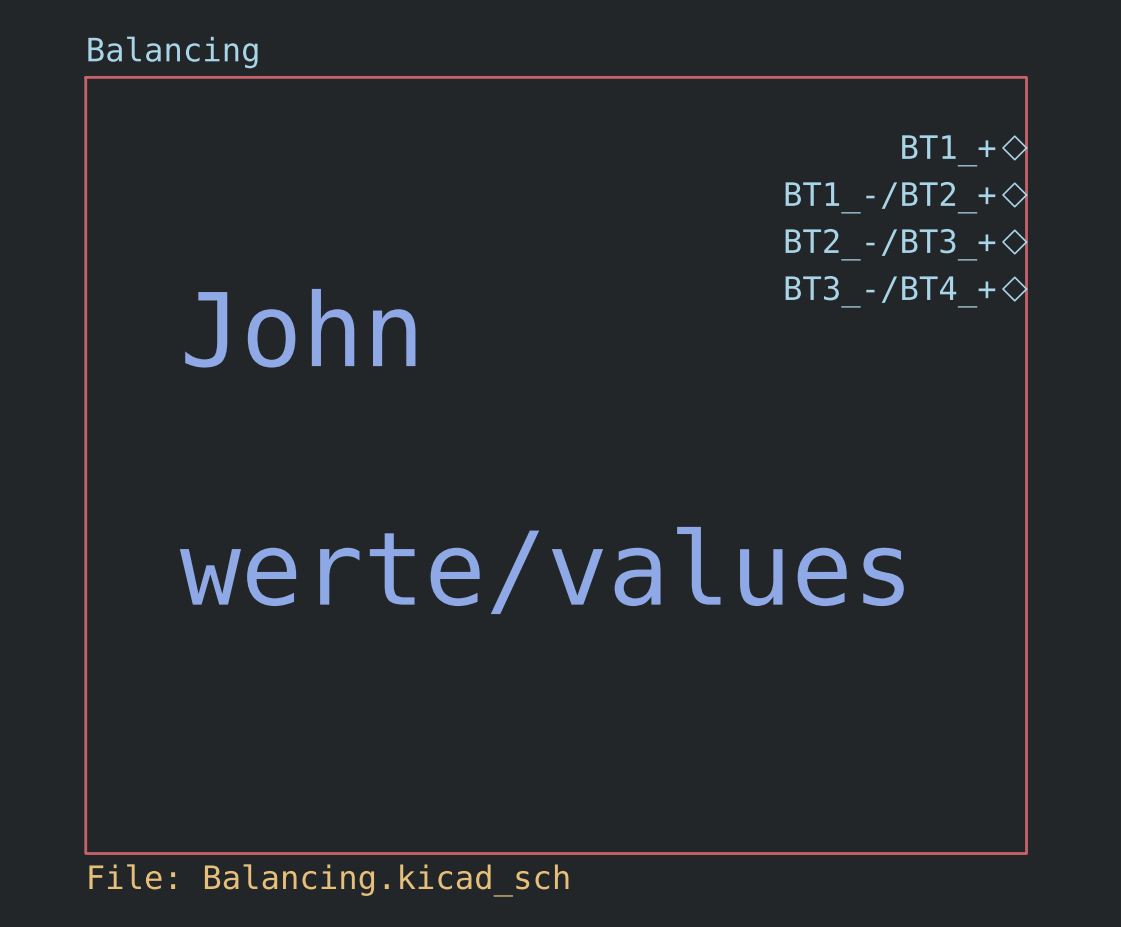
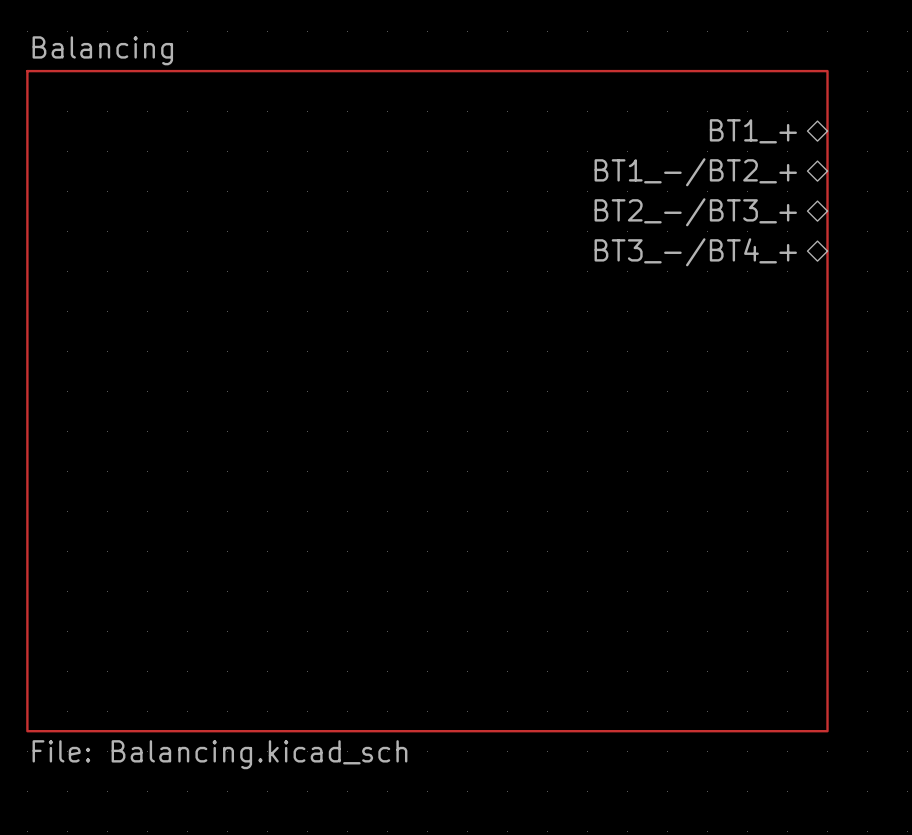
text: John (300, 328) -> none
text: werte/values (541, 570) -> none

